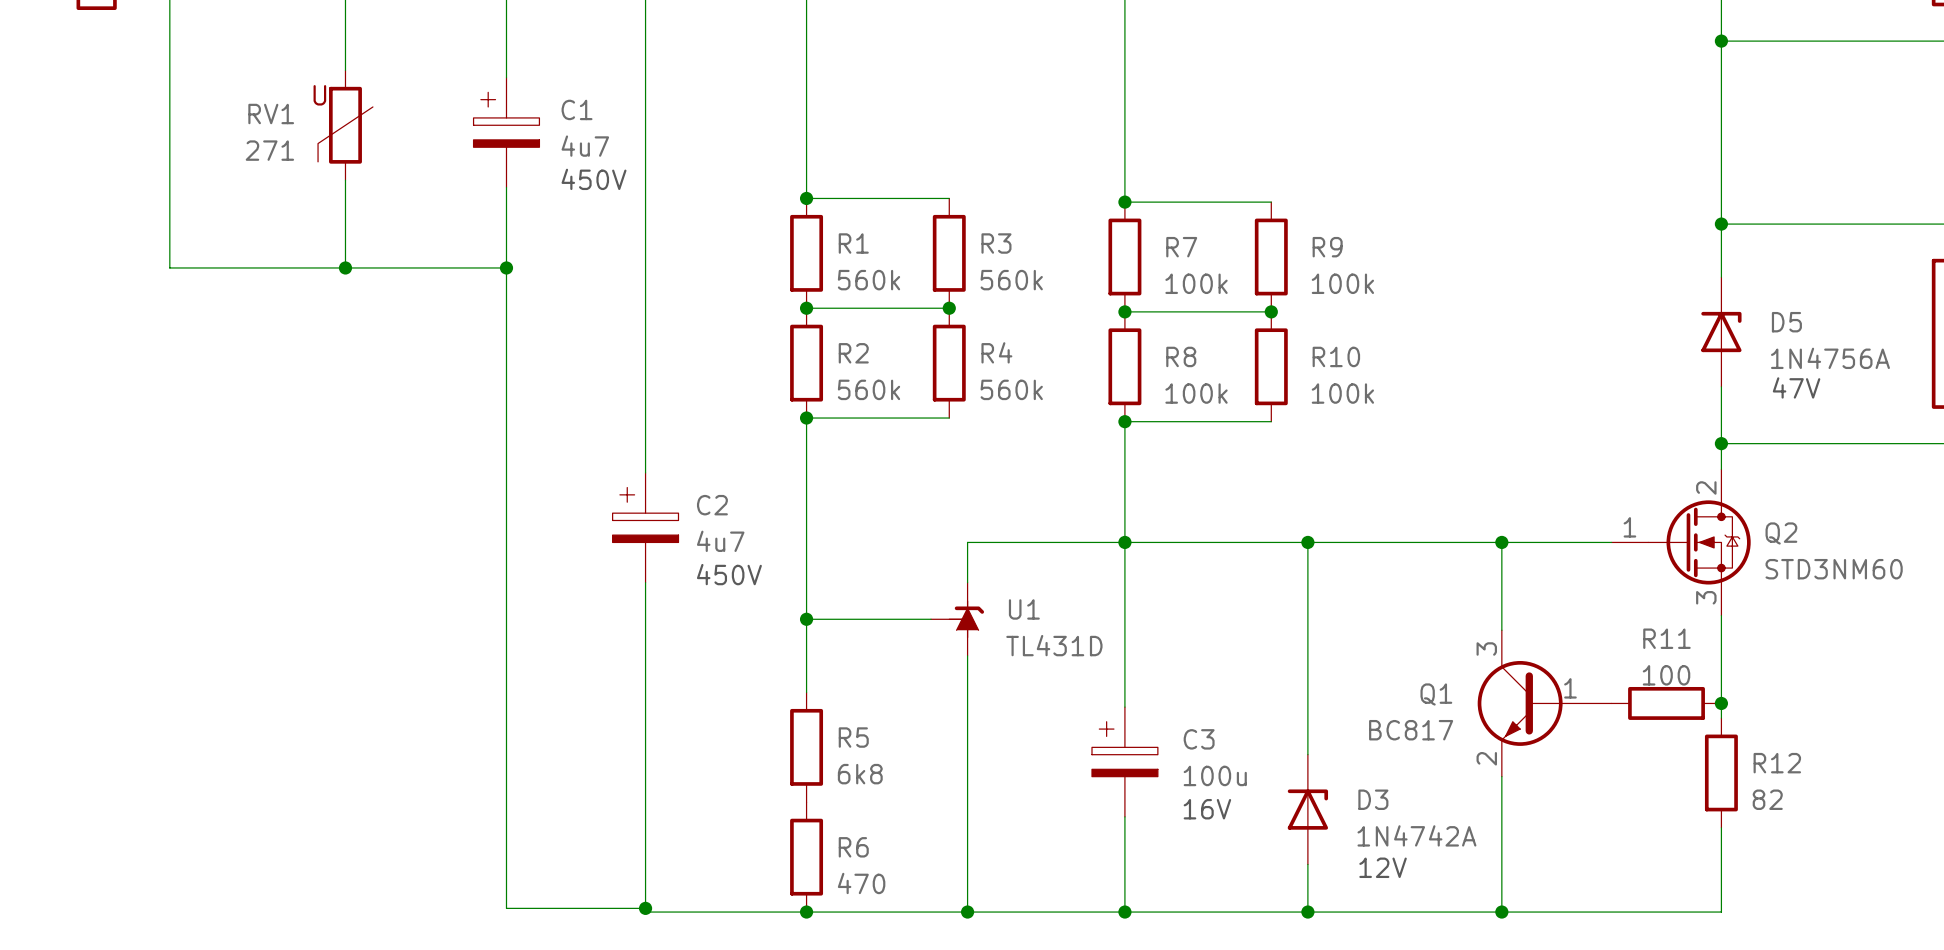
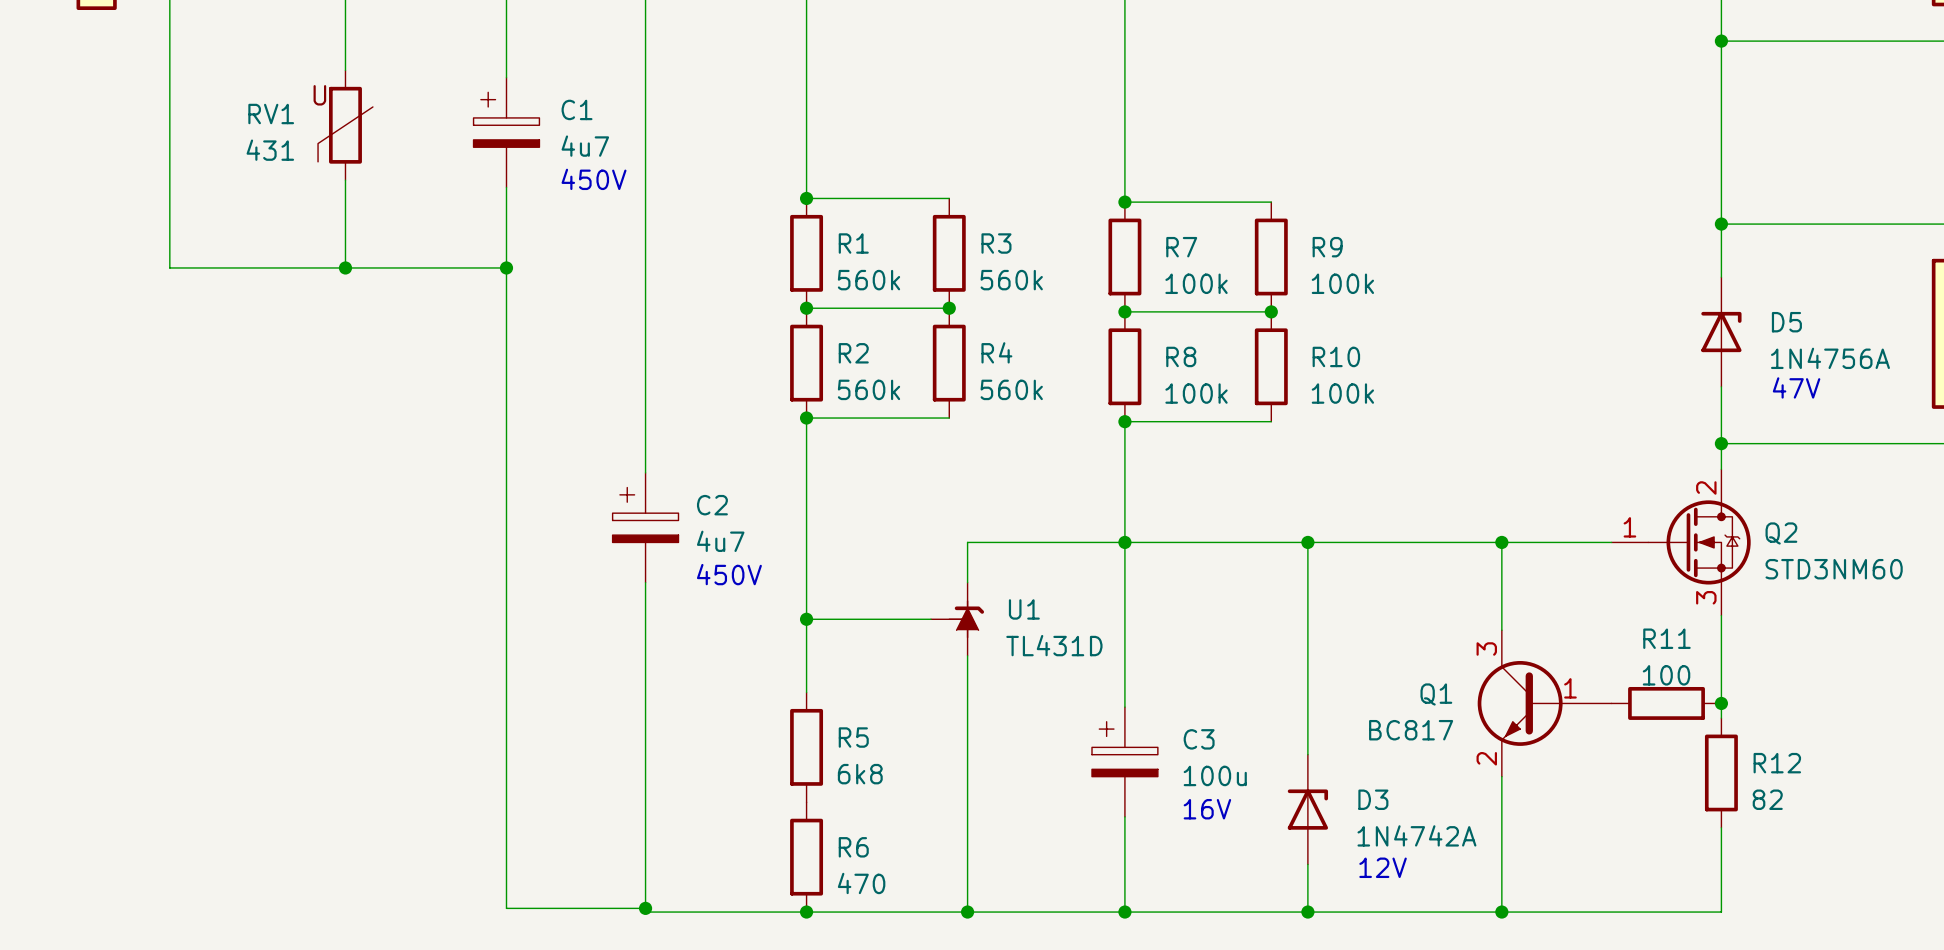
RV1 value: 271 (269, 150) -> 431 (270, 150)

